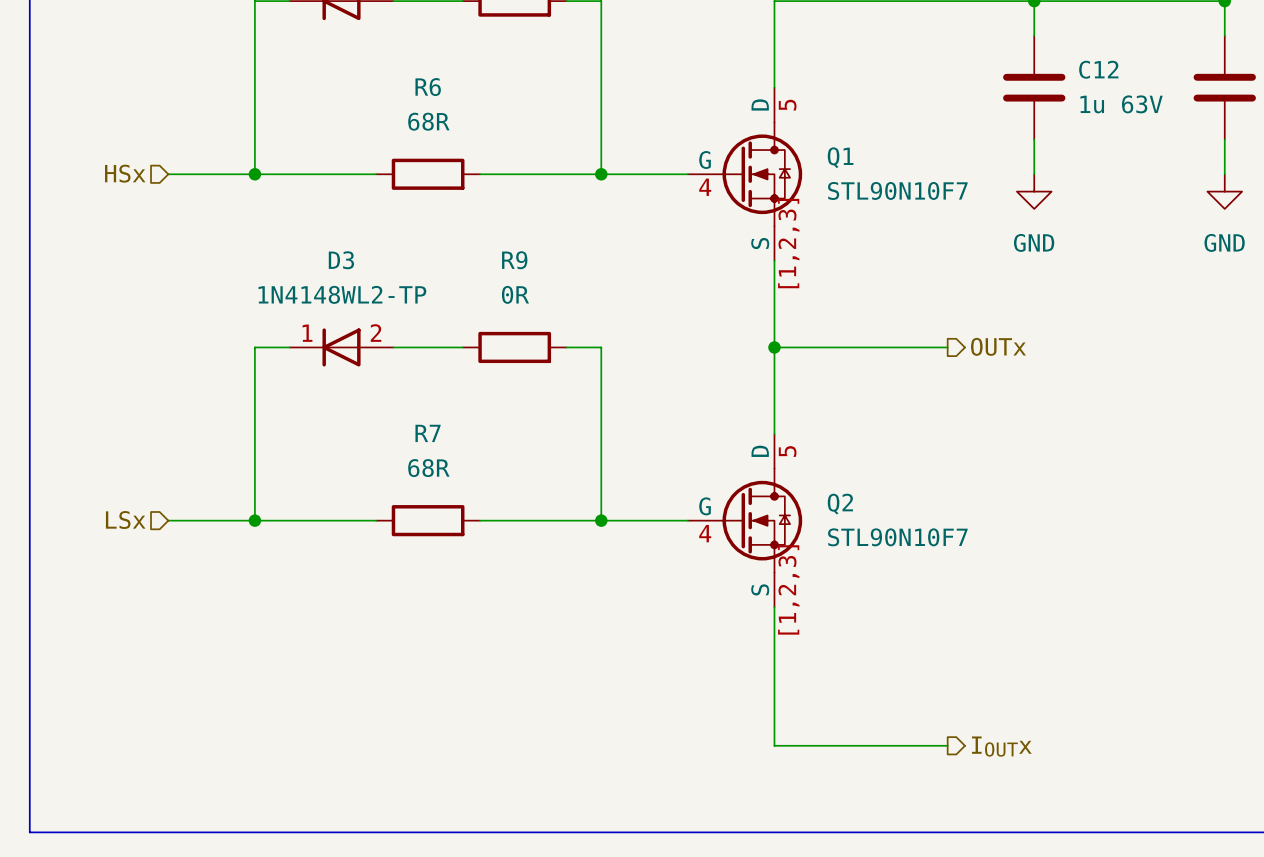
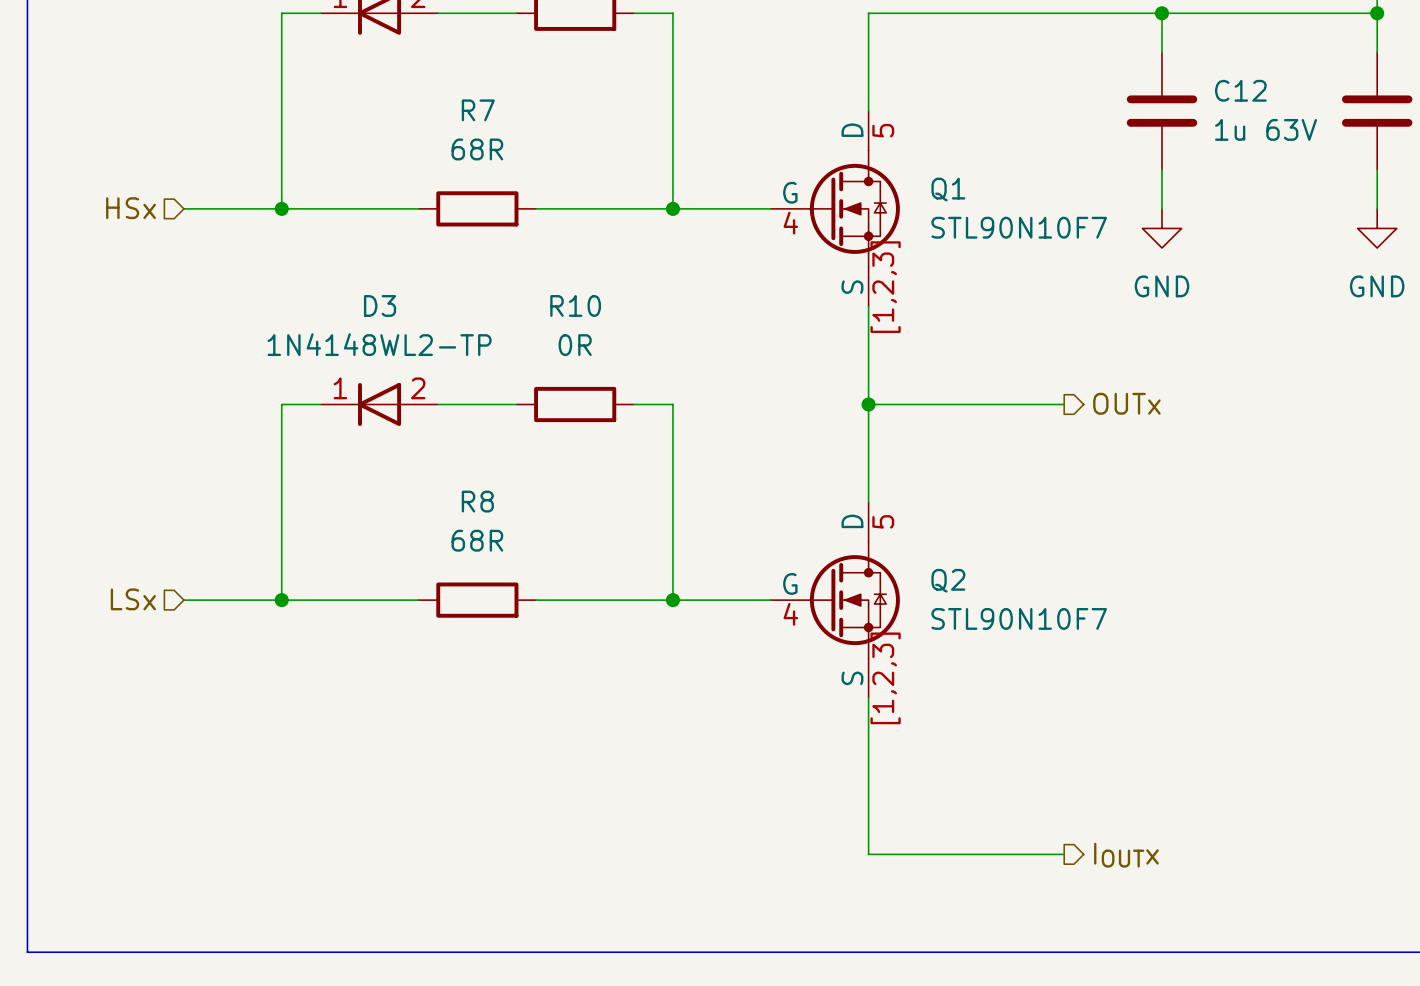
R6 name: R6 (428, 87) -> R7 (478, 110)
R9 name: R9 (514, 260) -> R10 (575, 305)
R7 name: R7 (428, 433) -> R8 (477, 501)

